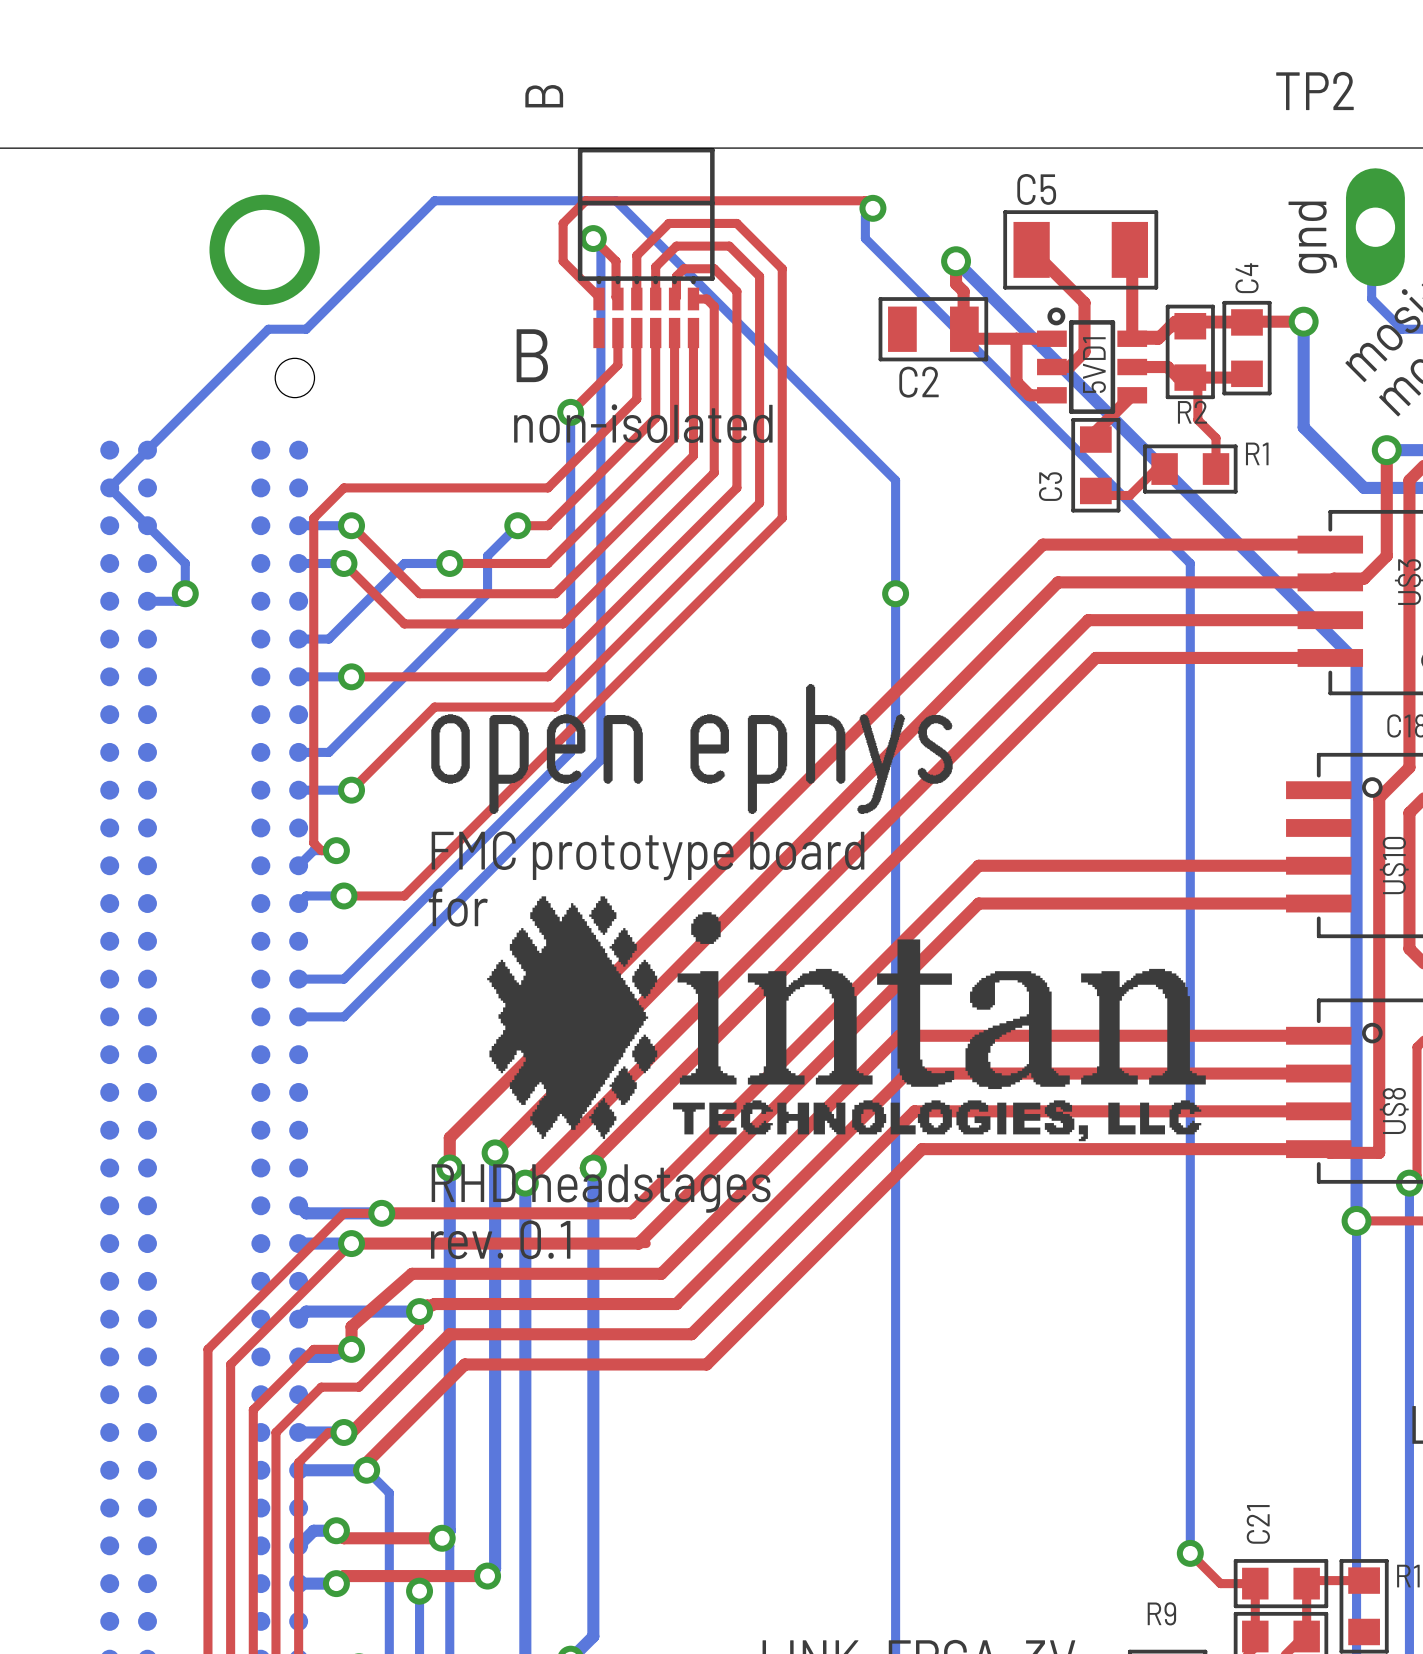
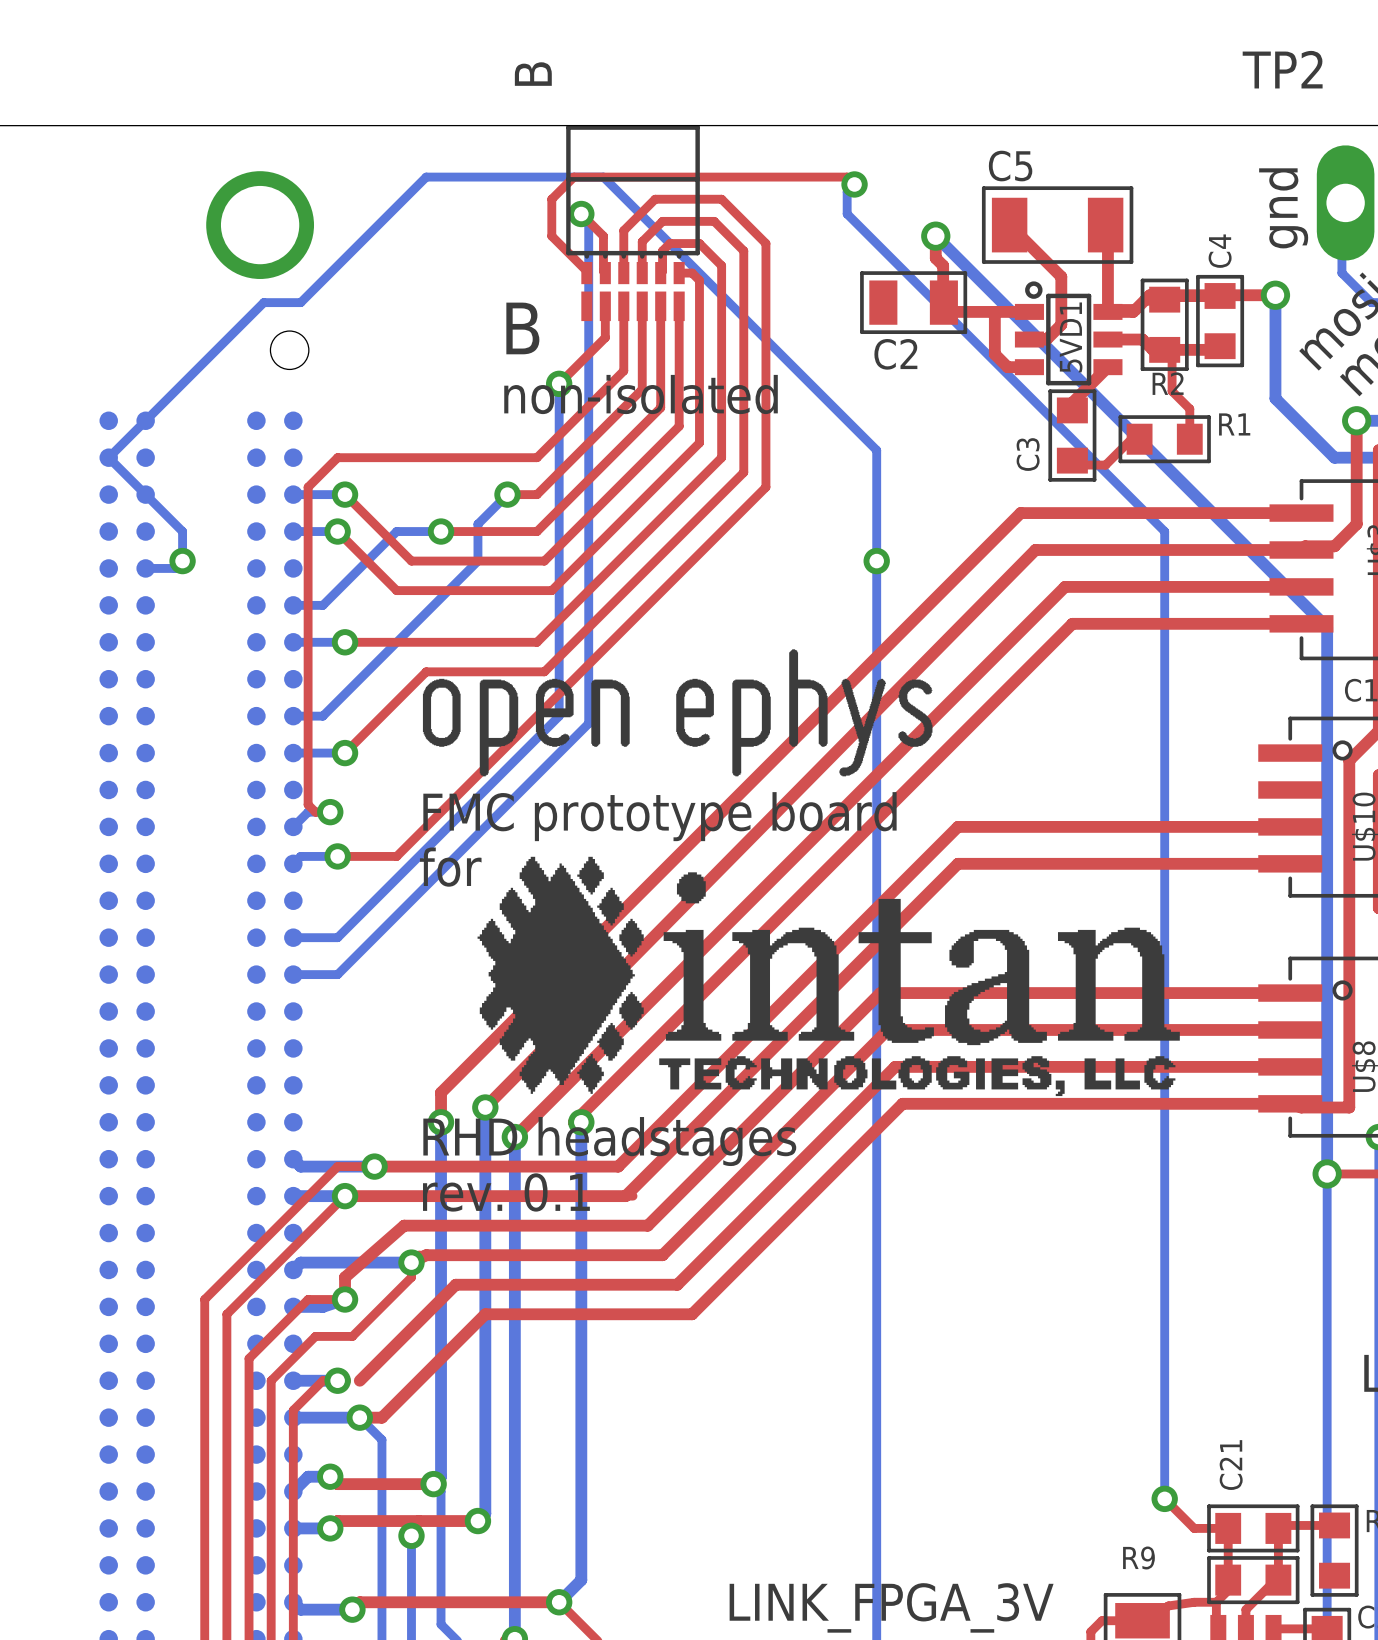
top track: (464, 1334) (449, 1334) (351, 1432) -> (455, 1284) (359, 1380)
top track: (495, 1364) (464, 1364) (359, 1470) (366, 1470) -> (485, 1314) (381, 1417) (359, 1417)

